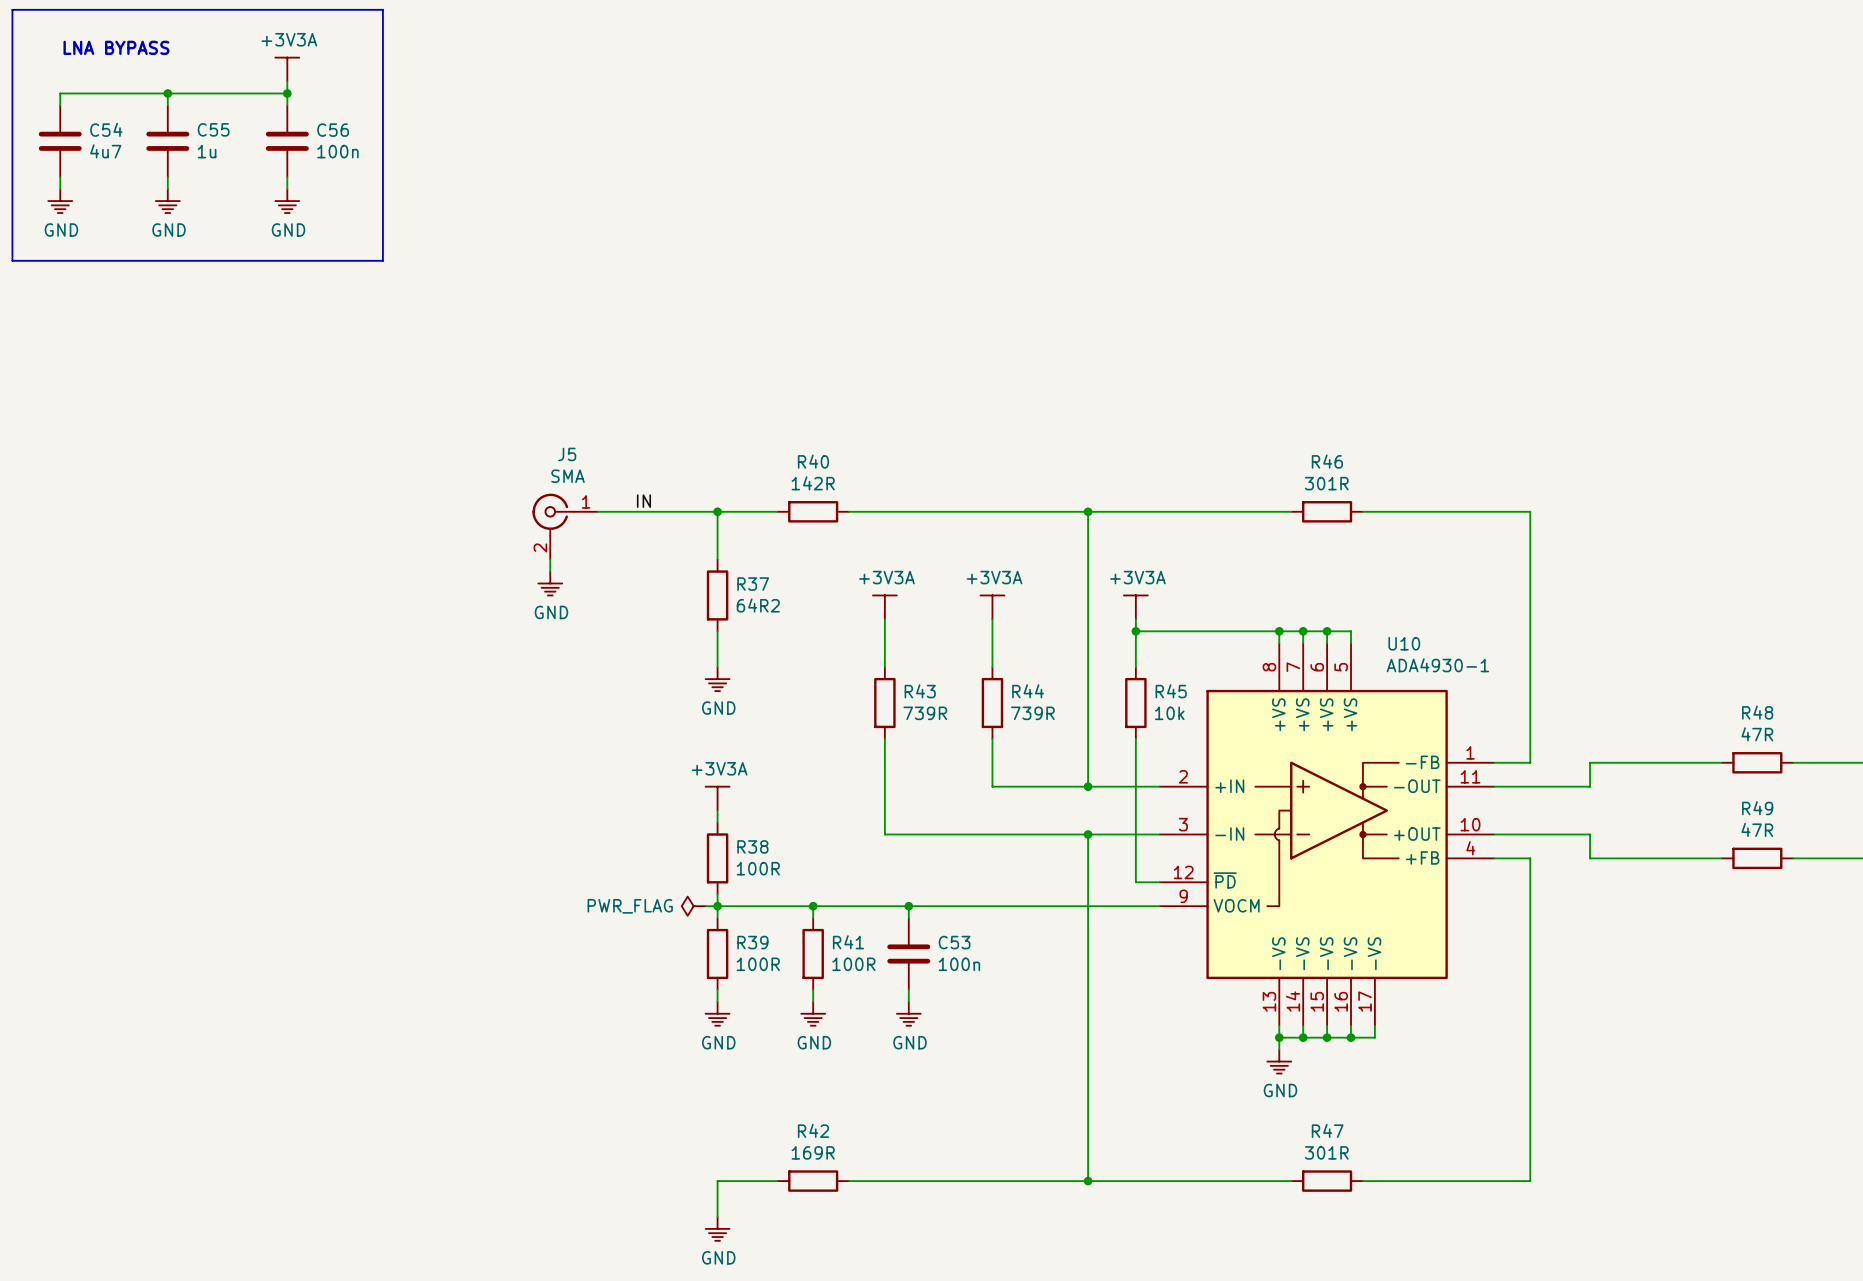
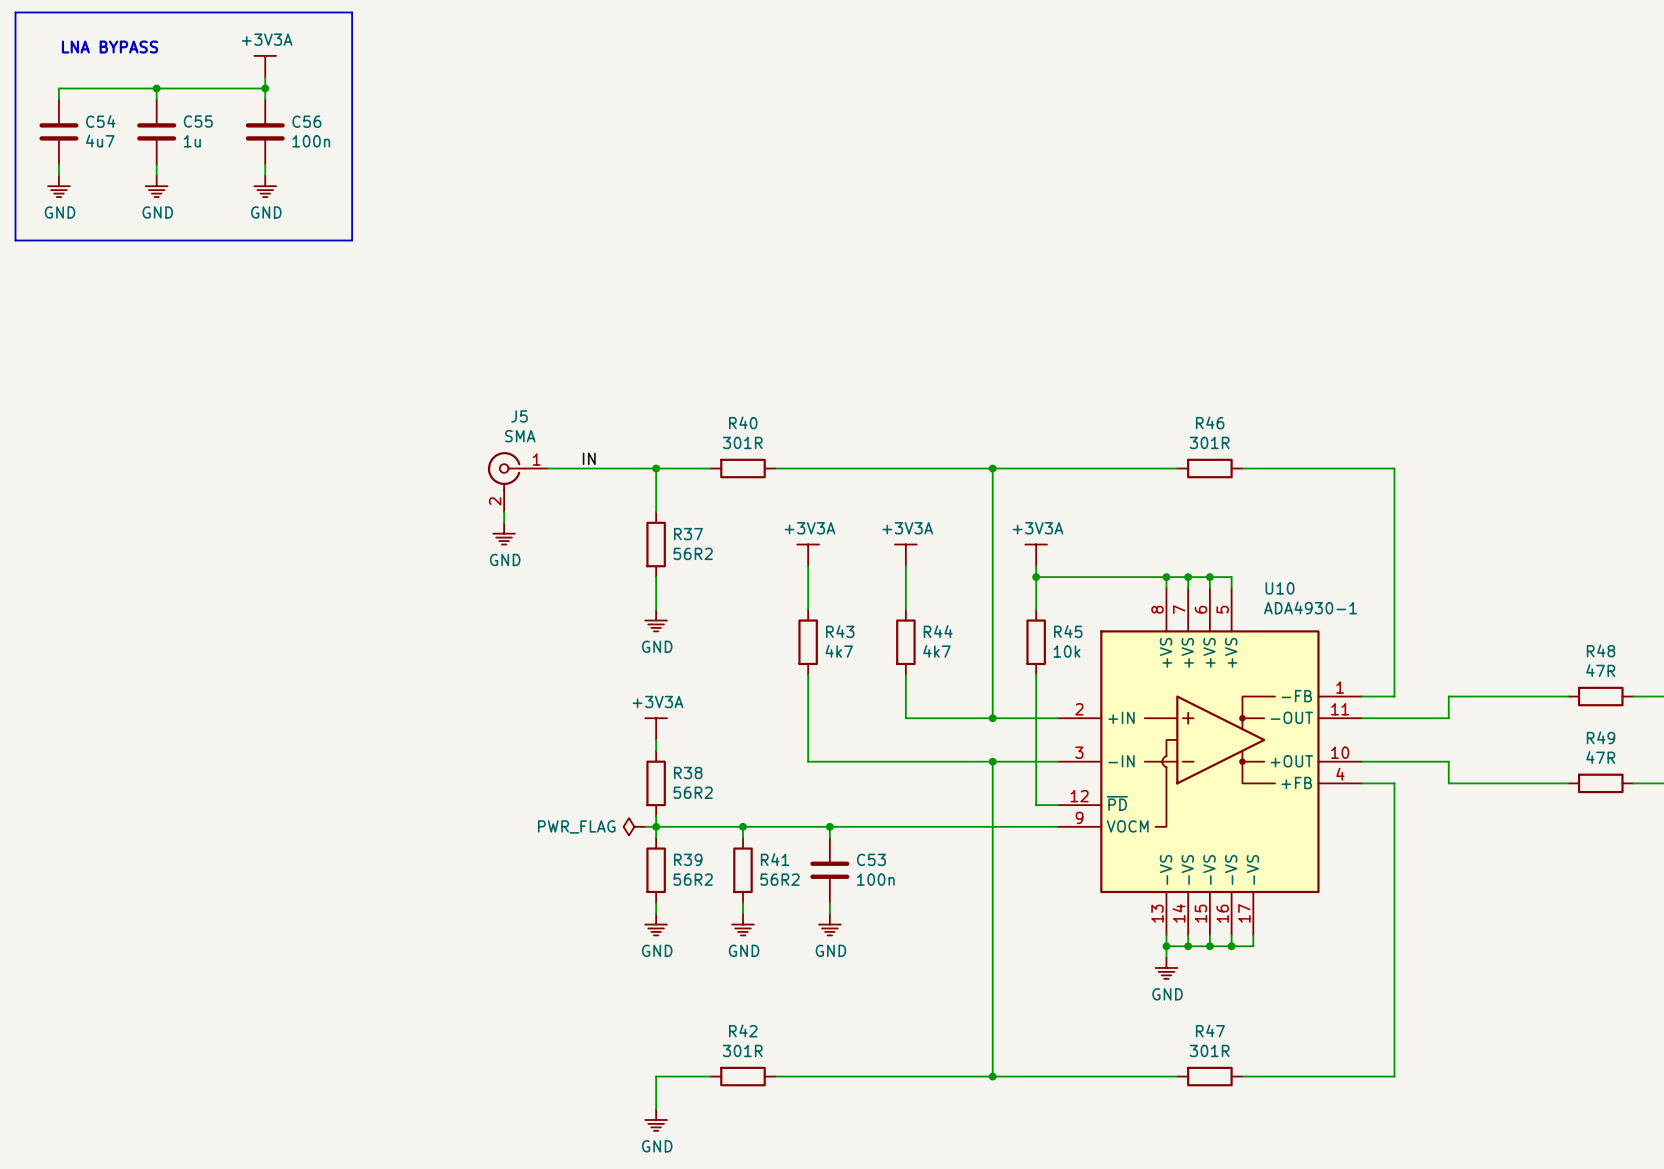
R40 value: 142R (813, 483) -> 301R (742, 442)
R37 value: 64R2 (758, 605) -> 56R2 (693, 553)
R43 value: 739R (925, 713) -> 4k7 (839, 651)
R44 value: 739R (1032, 713) -> 4k7 (936, 651)
R38 value: 100R (758, 868) -> 56R2 (693, 792)
R39 value: 100R (758, 964) -> 56R2 (693, 879)
R41 value: 100R (853, 964) -> 56R2 (779, 879)
R42 value: 169R (813, 1152) -> 301R (742, 1050)

